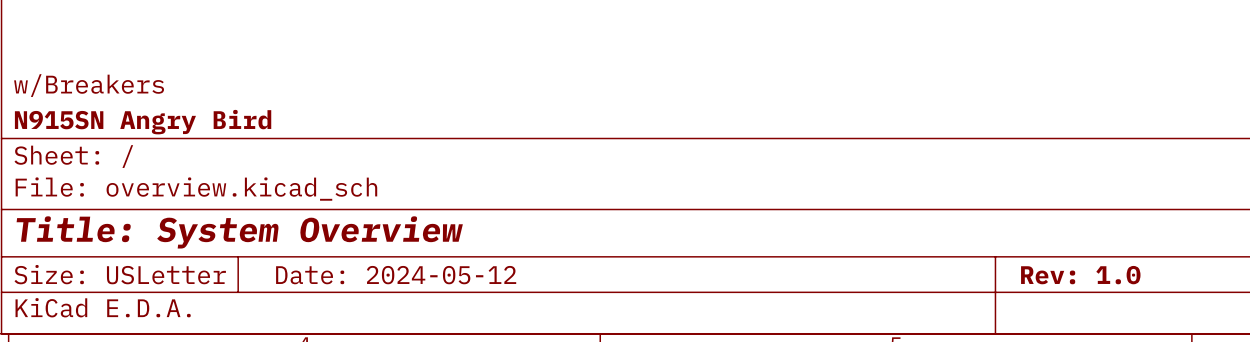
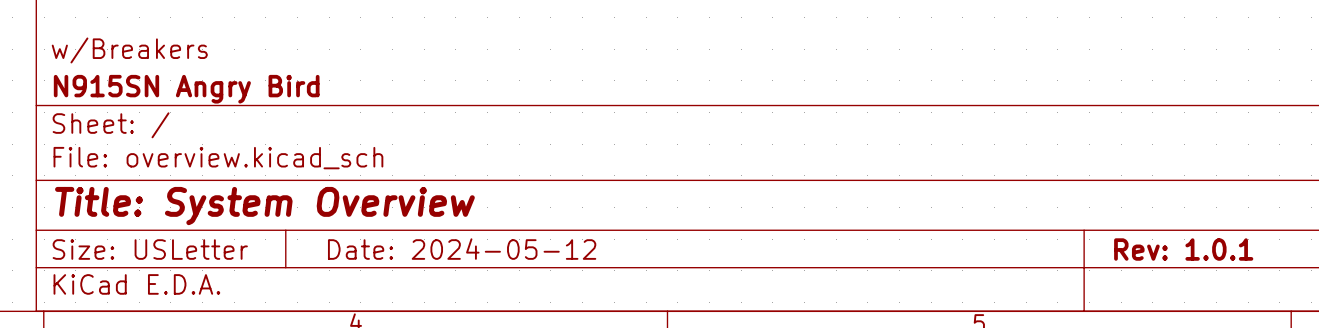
title block: Rev: 1.0 (1080, 275) -> Rev: 1.0.1 (1183, 249)

